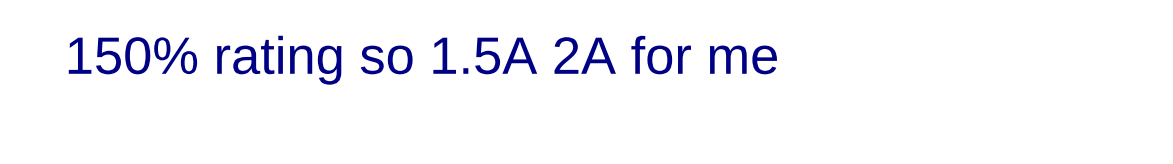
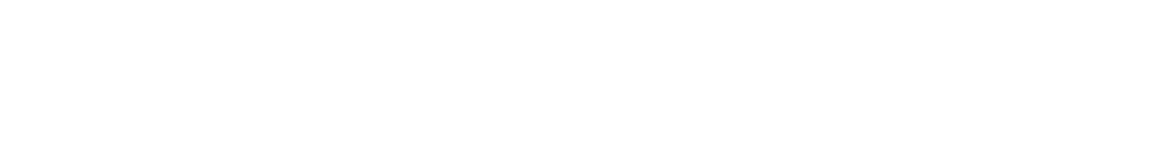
text: 150% rating so 1.5A 2A for me (422, 60) -> none

